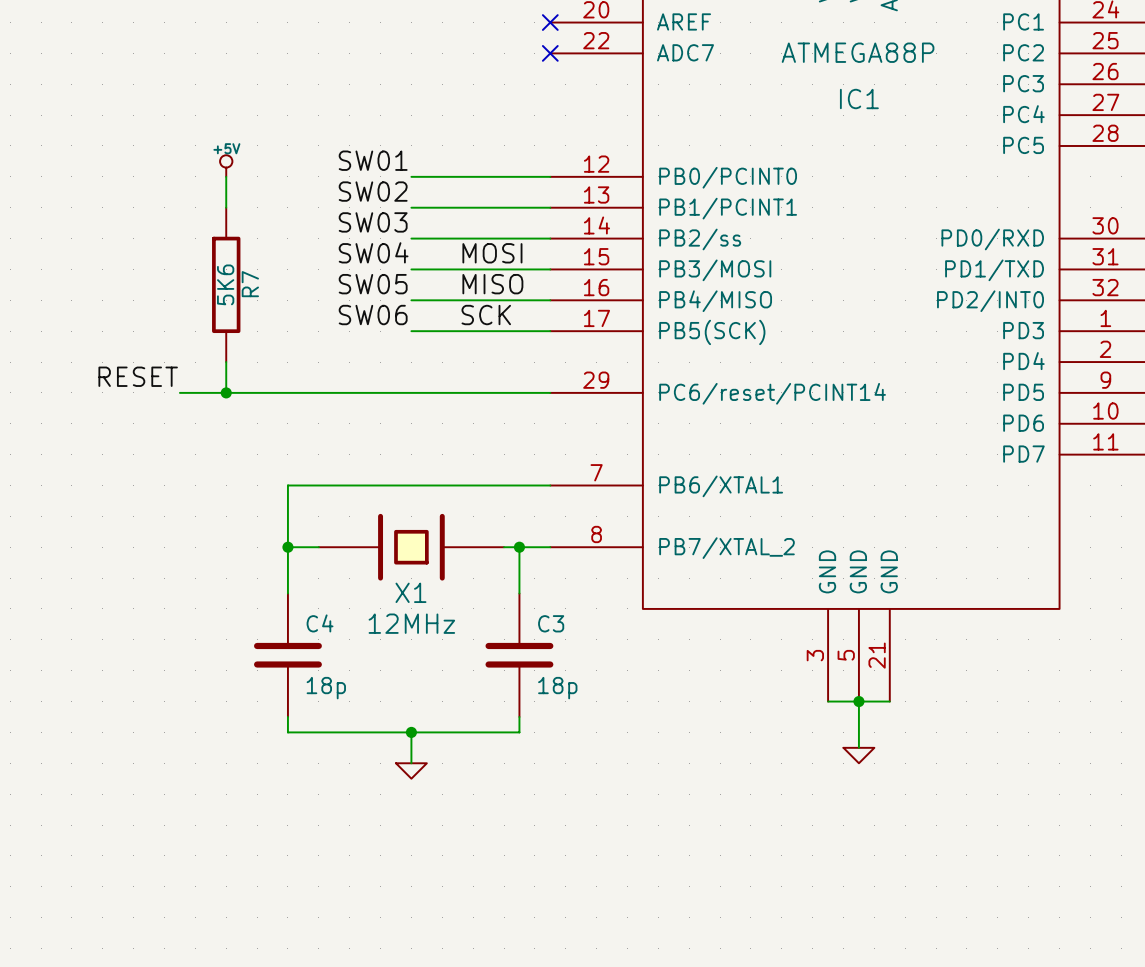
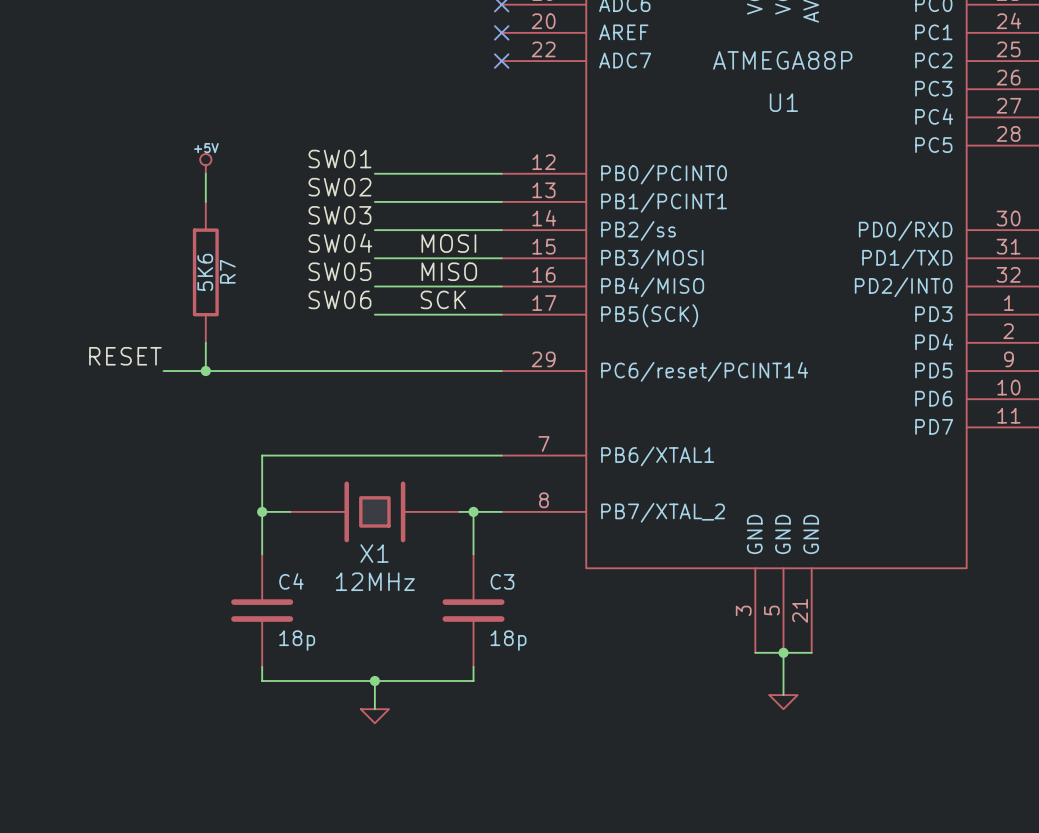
IC1 name: IC1 (859, 99) -> U1 (783, 102)

